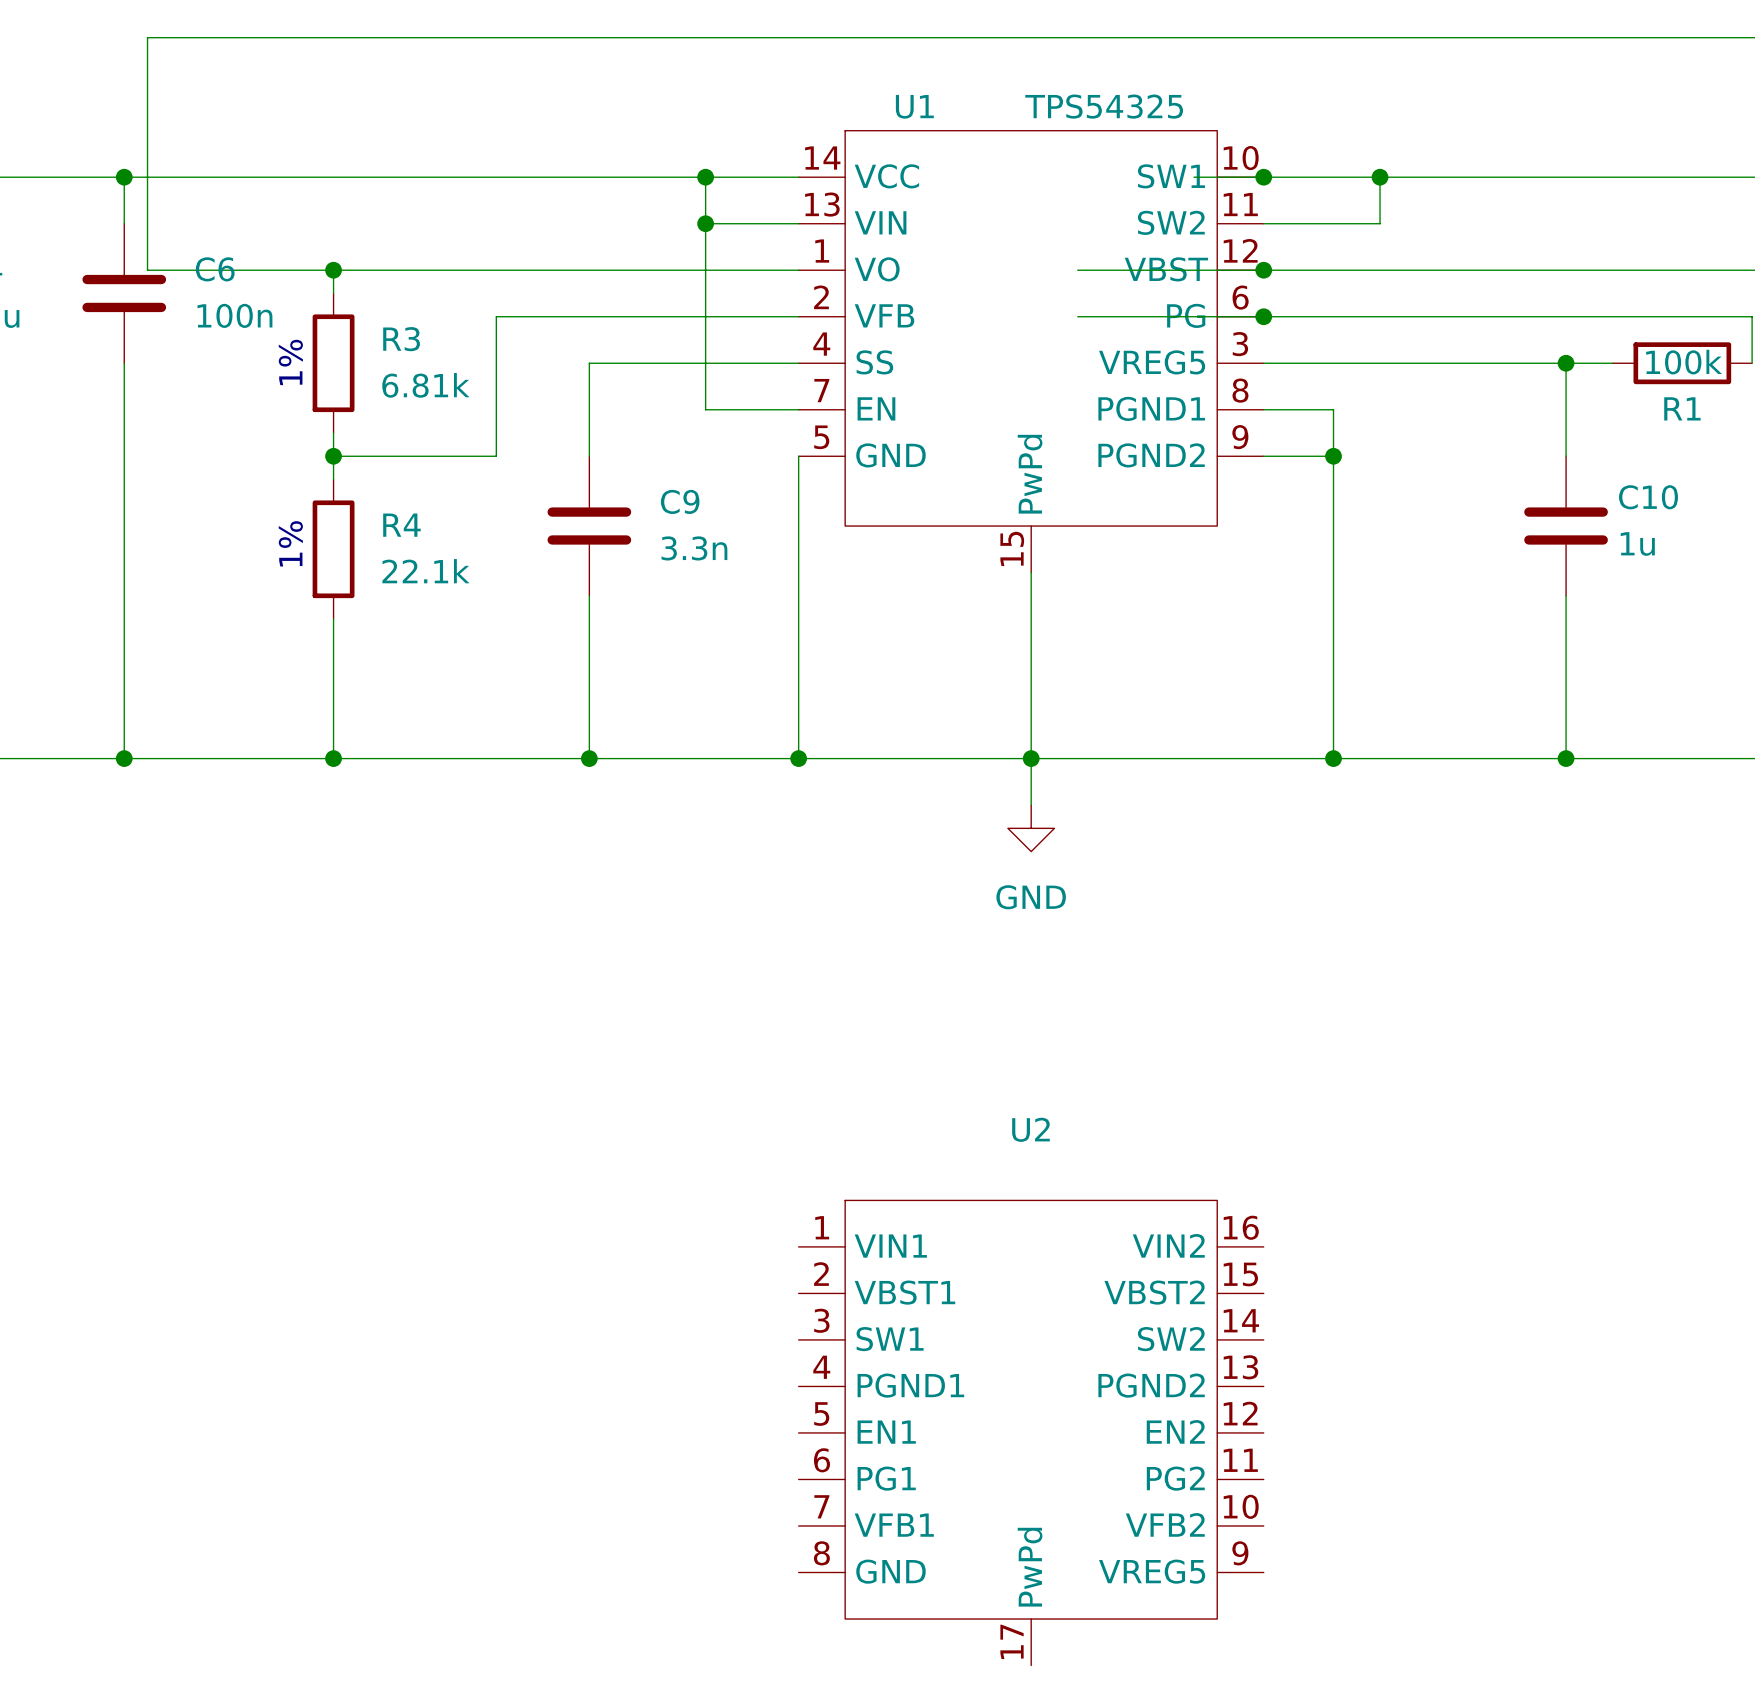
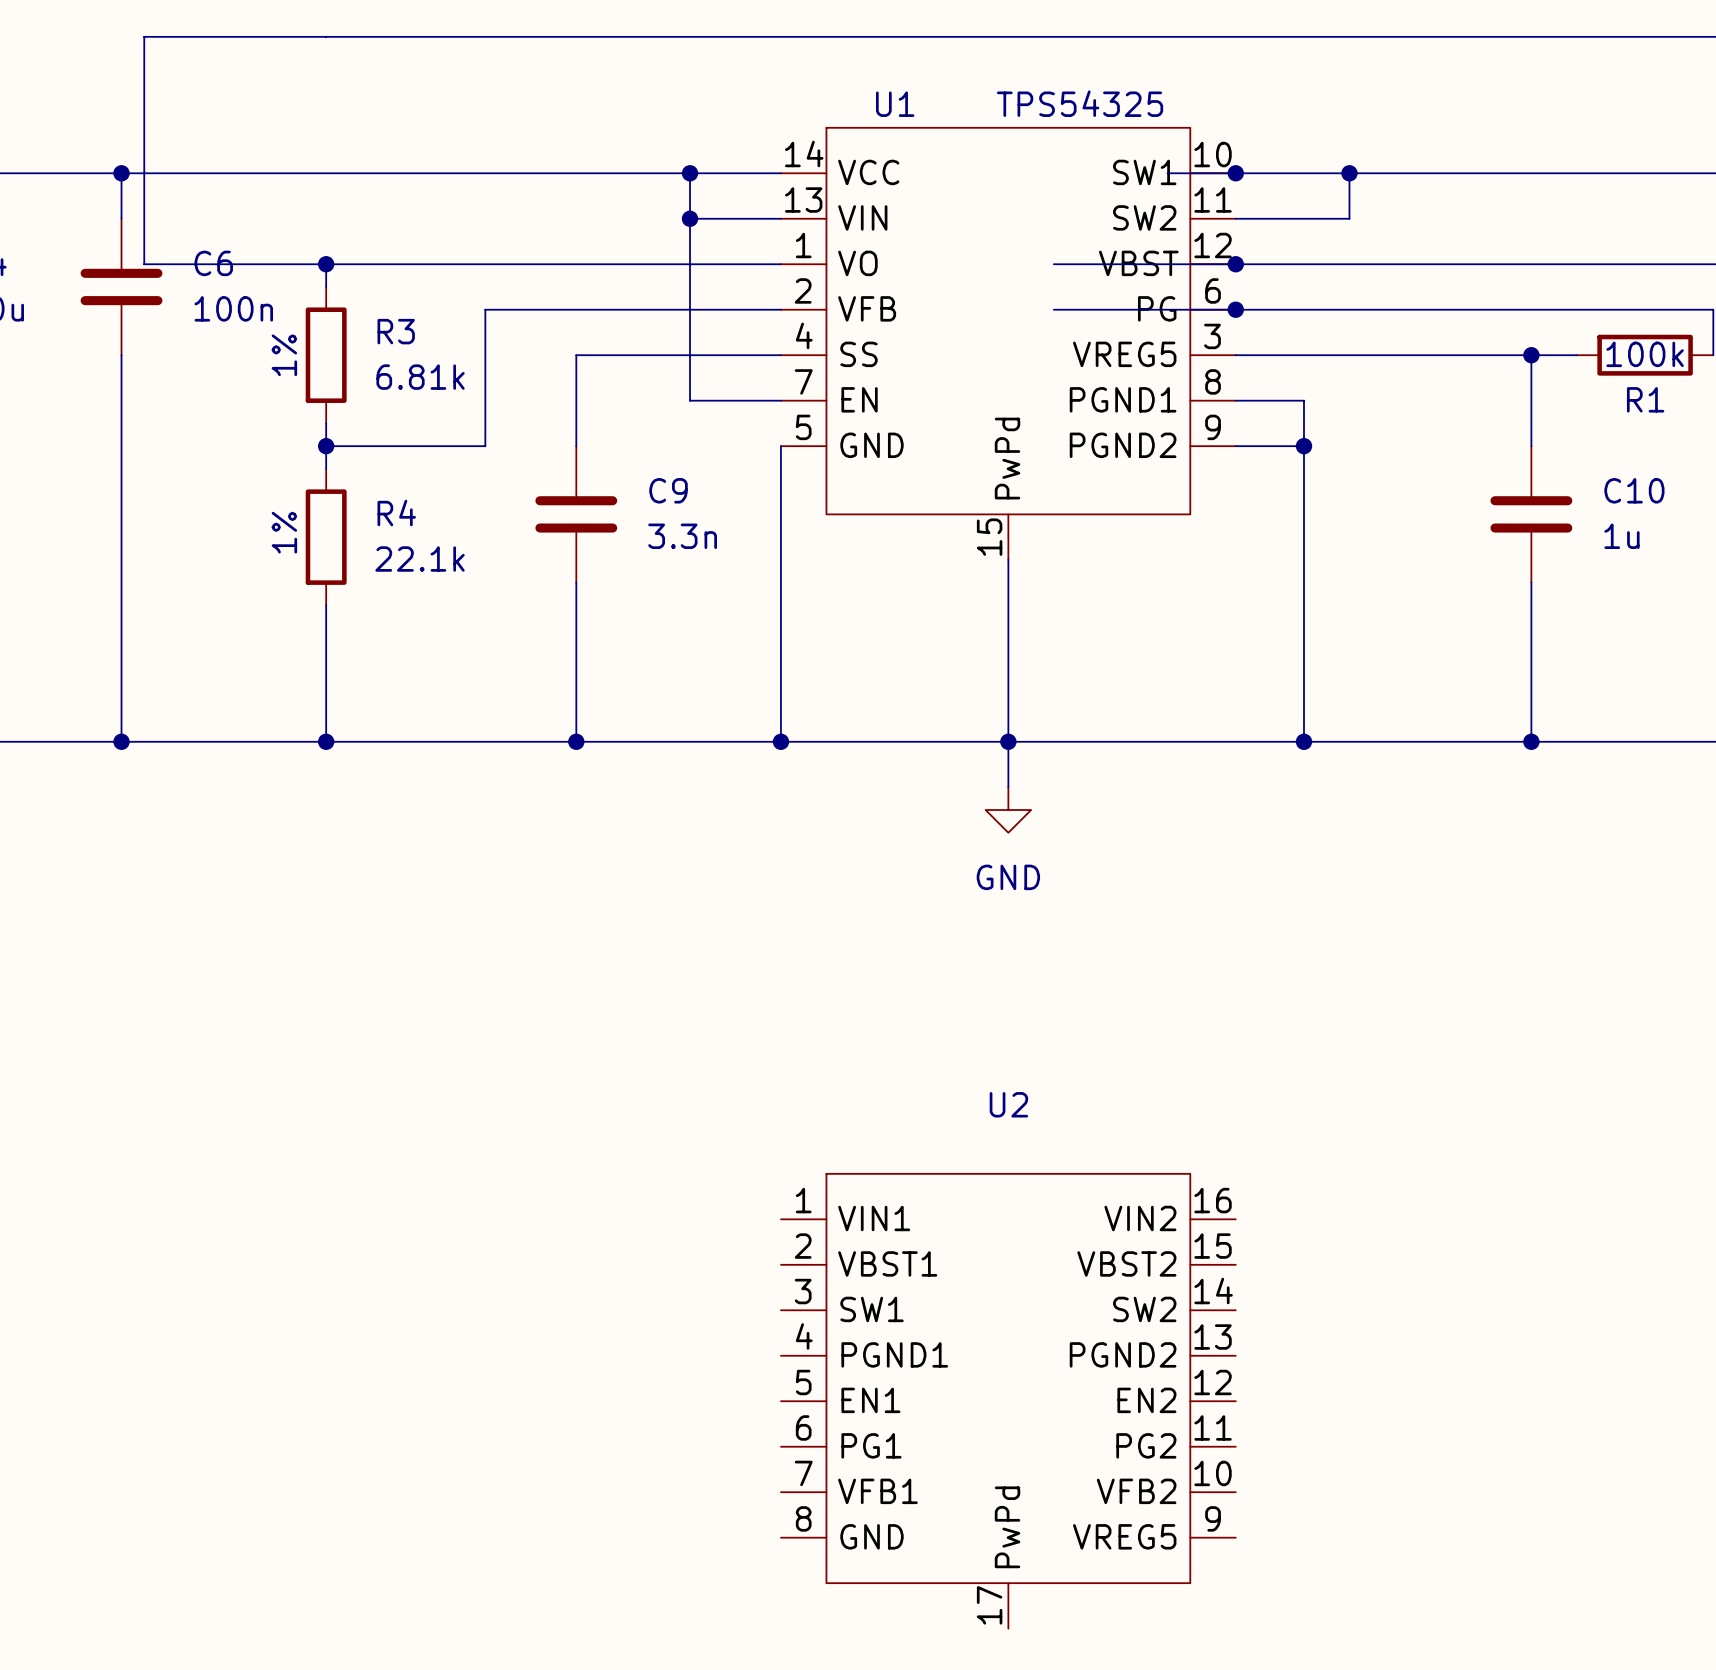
C10 name position: C10 (1648, 497) -> C10 (1634, 490)
C10 value position: 1u (1637, 543) -> 1u (1621, 536)

